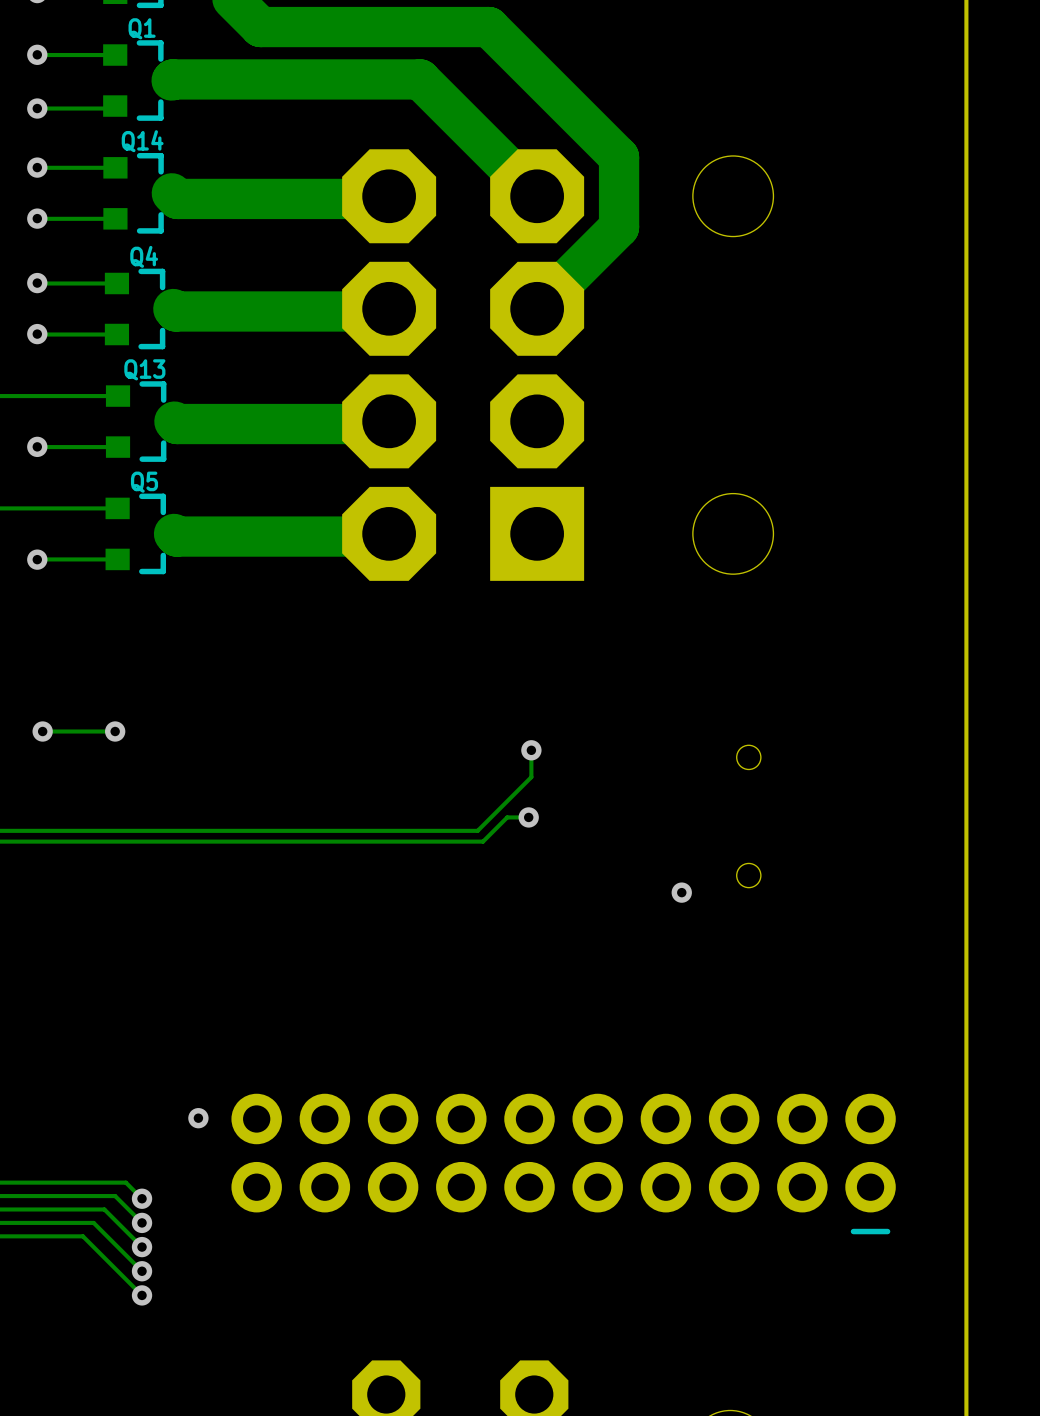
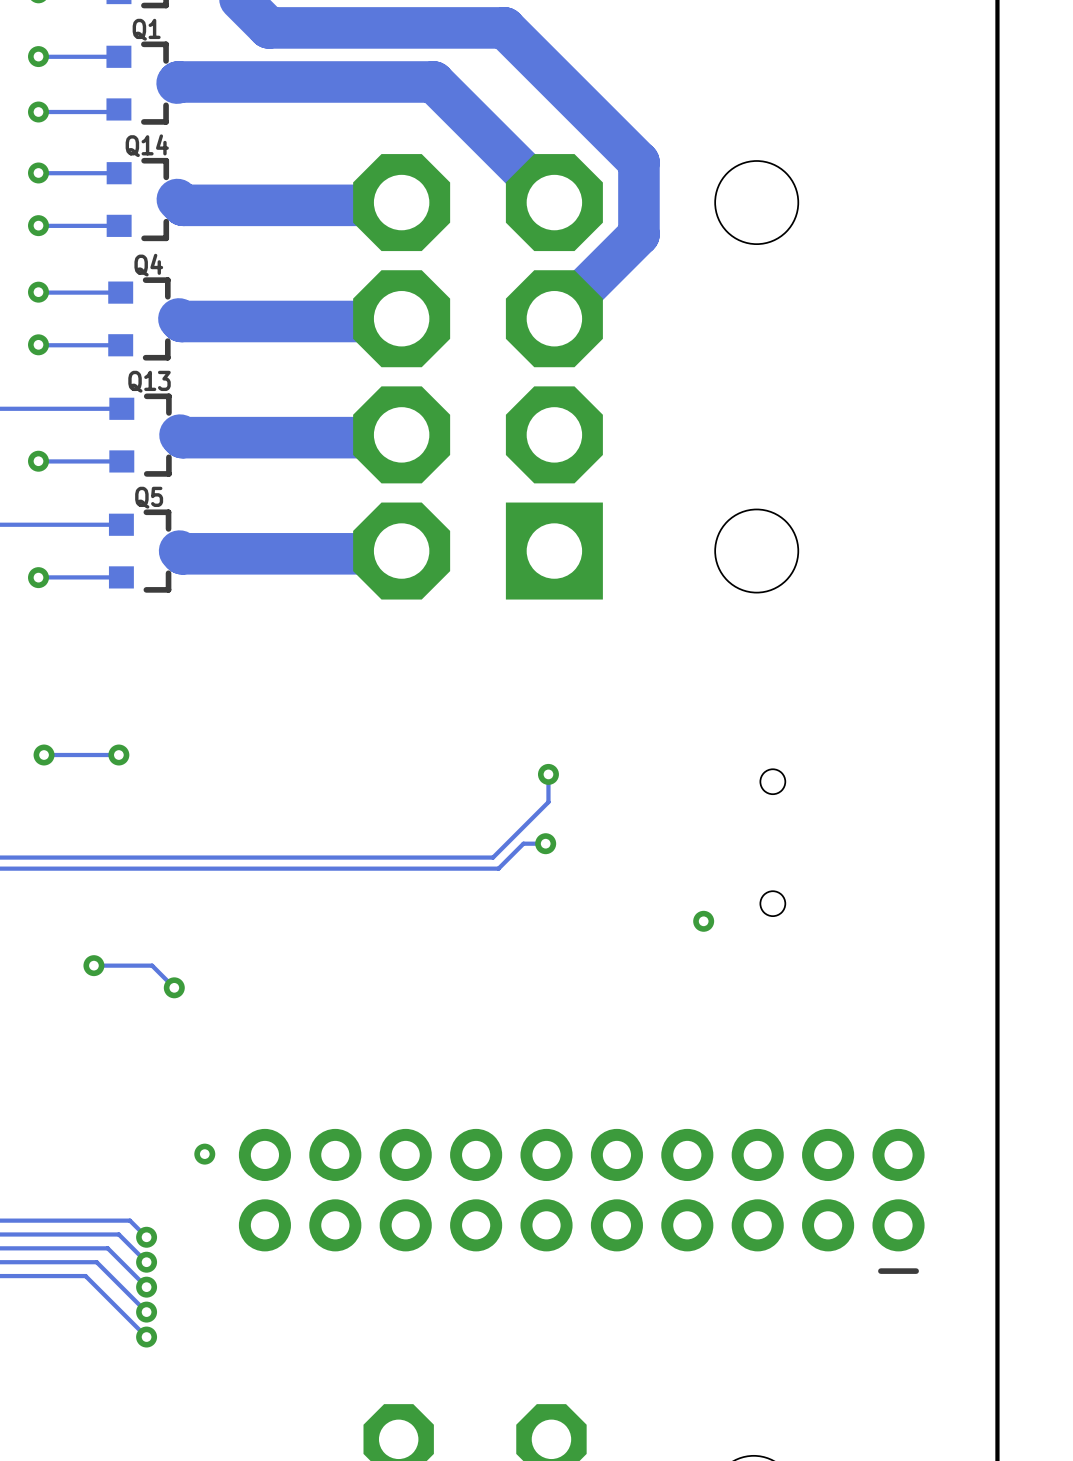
track: none -> (93, 965) (152, 965) (174, 987)
via: none -> (93, 965)
via: none -> (174, 987)

